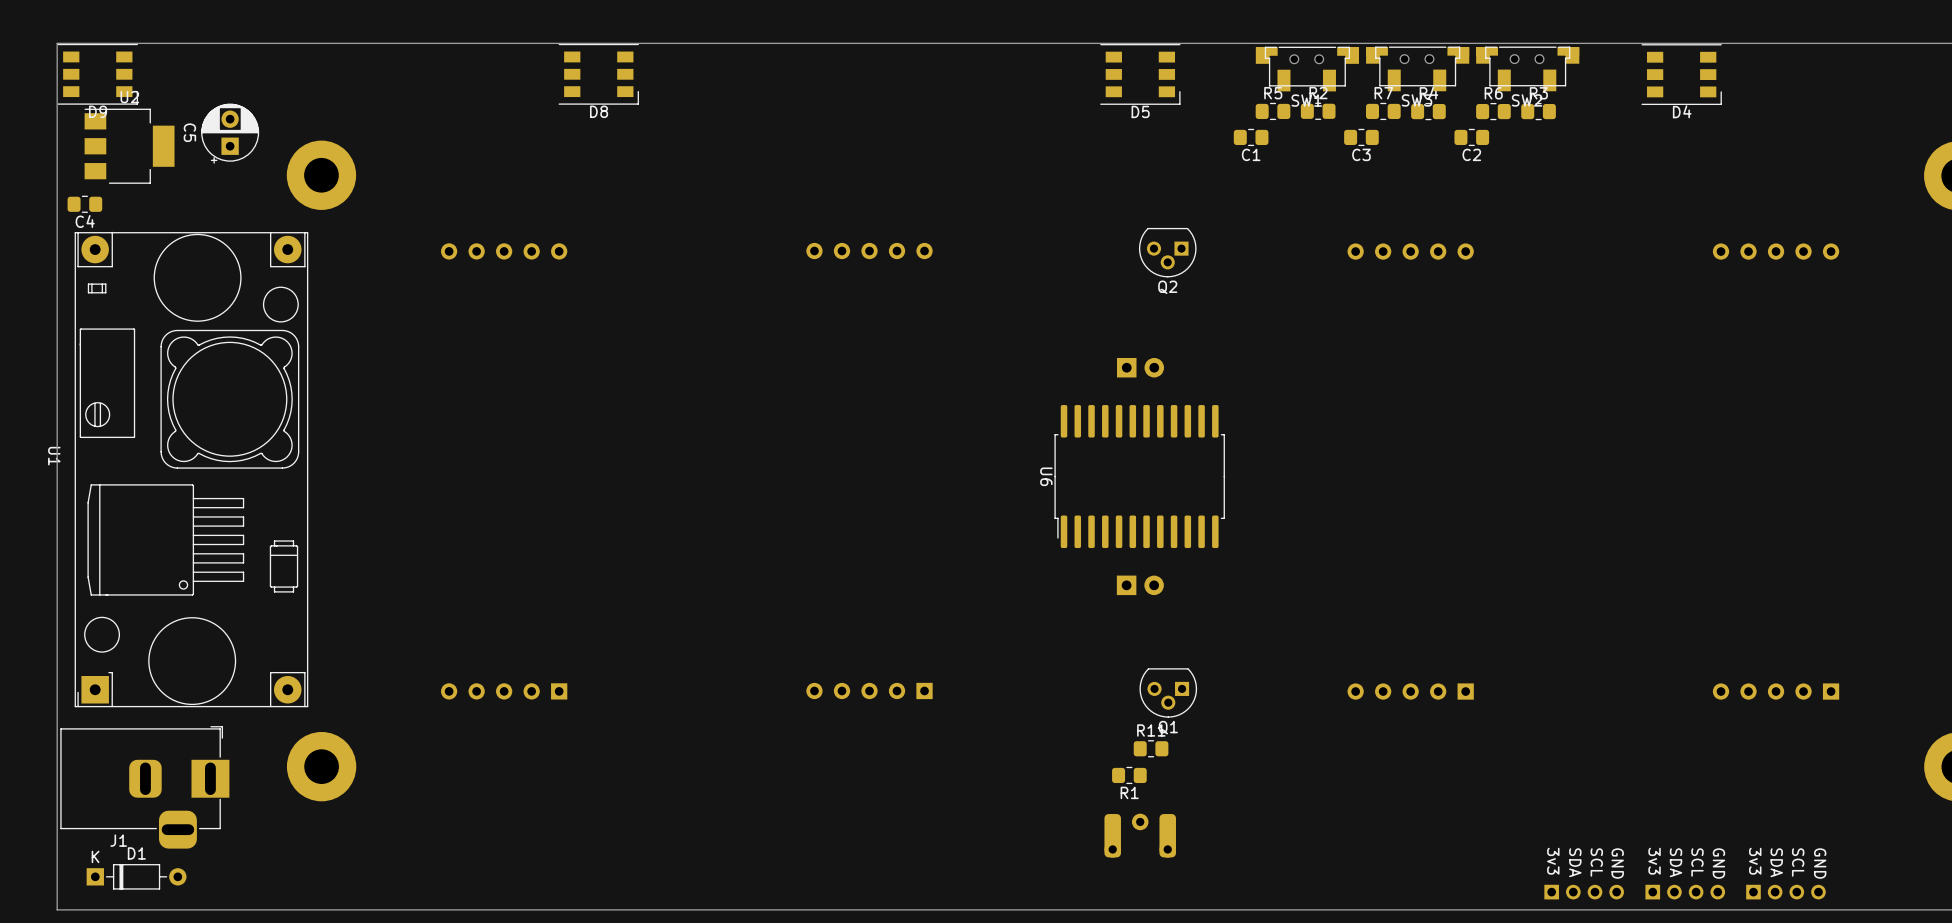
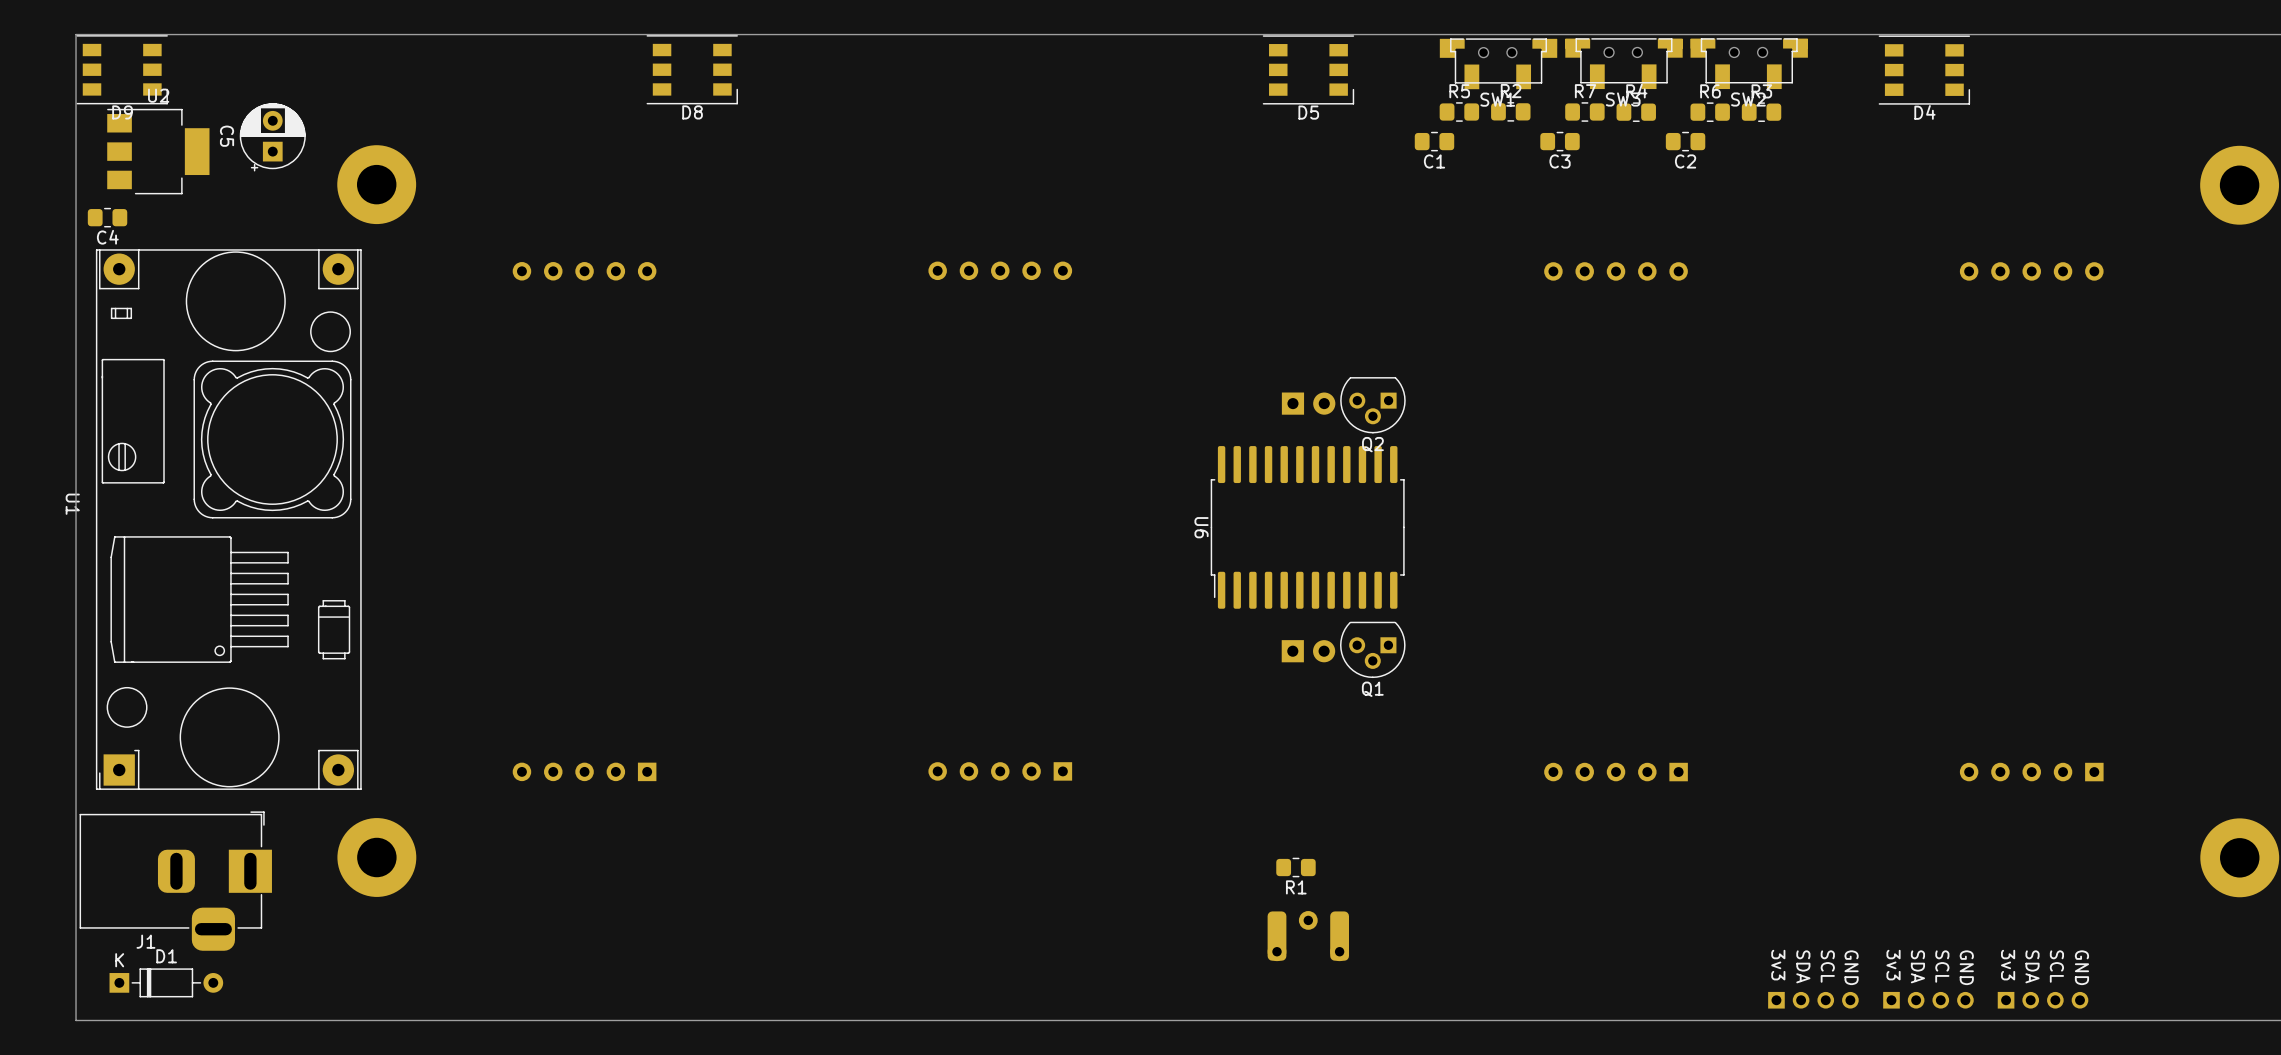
Q2 position: (1167, 252) -> (1372, 405)
Q1 position: (1168, 692) -> (1372, 649)
R11: (1151, 748) -> none

